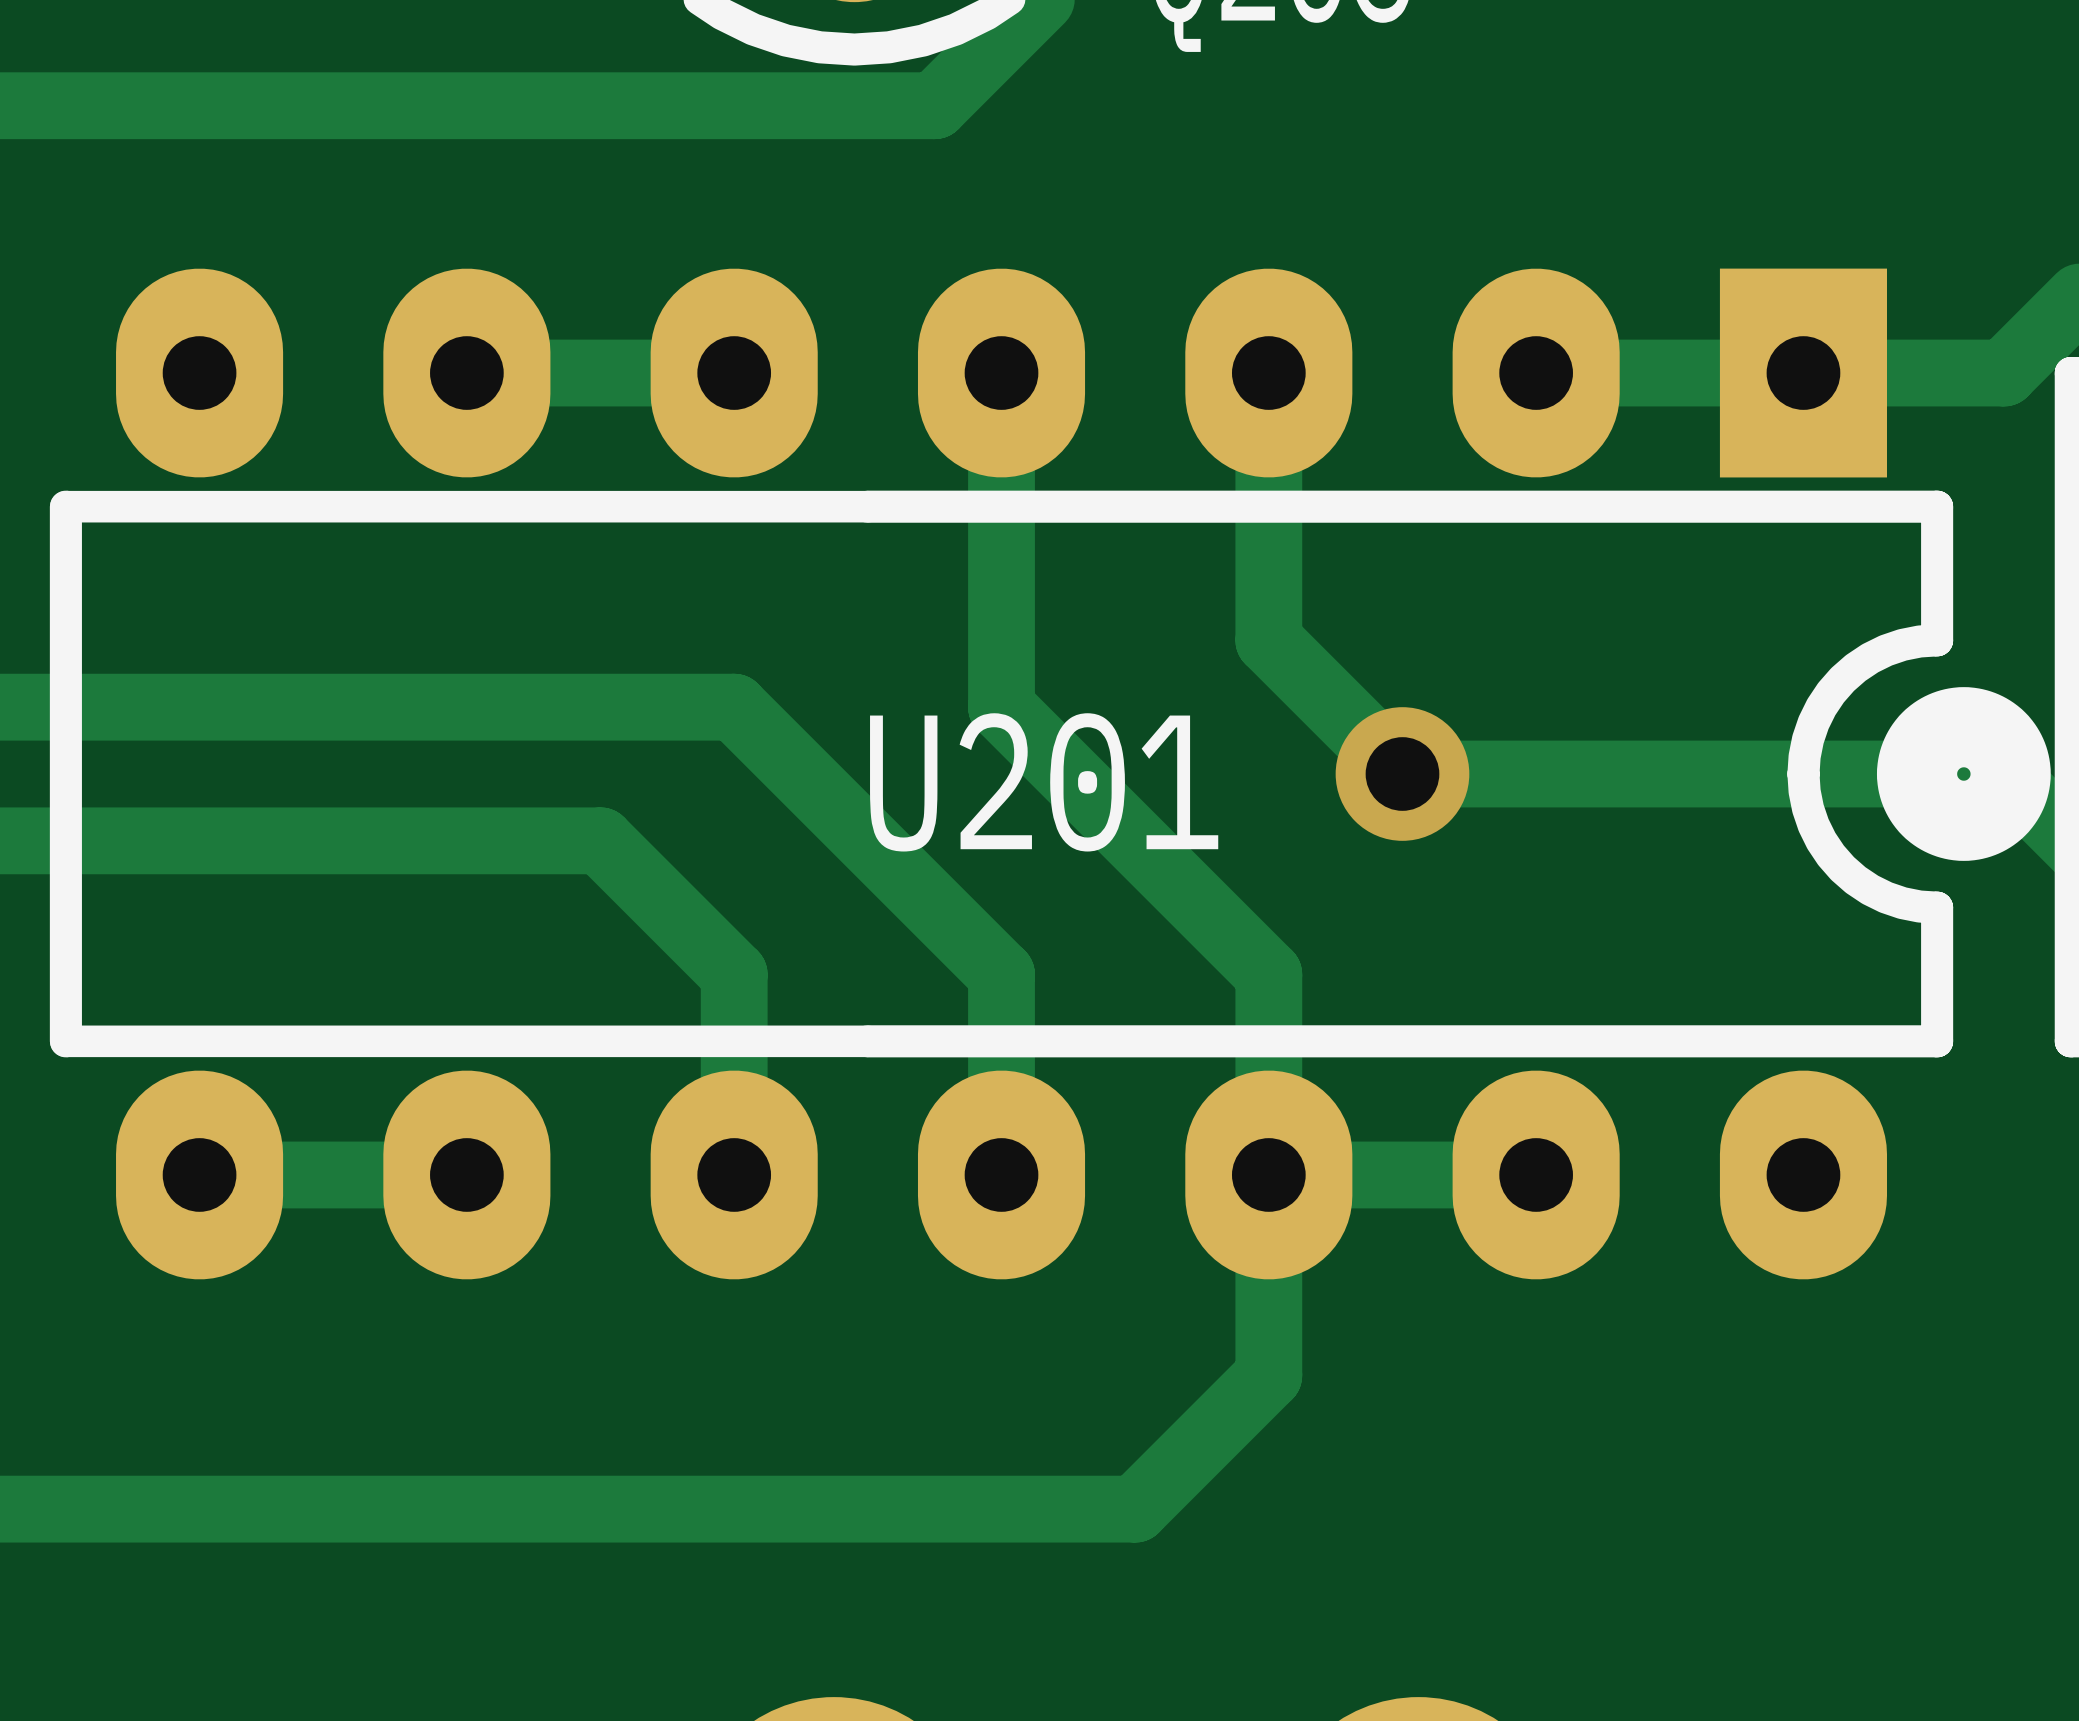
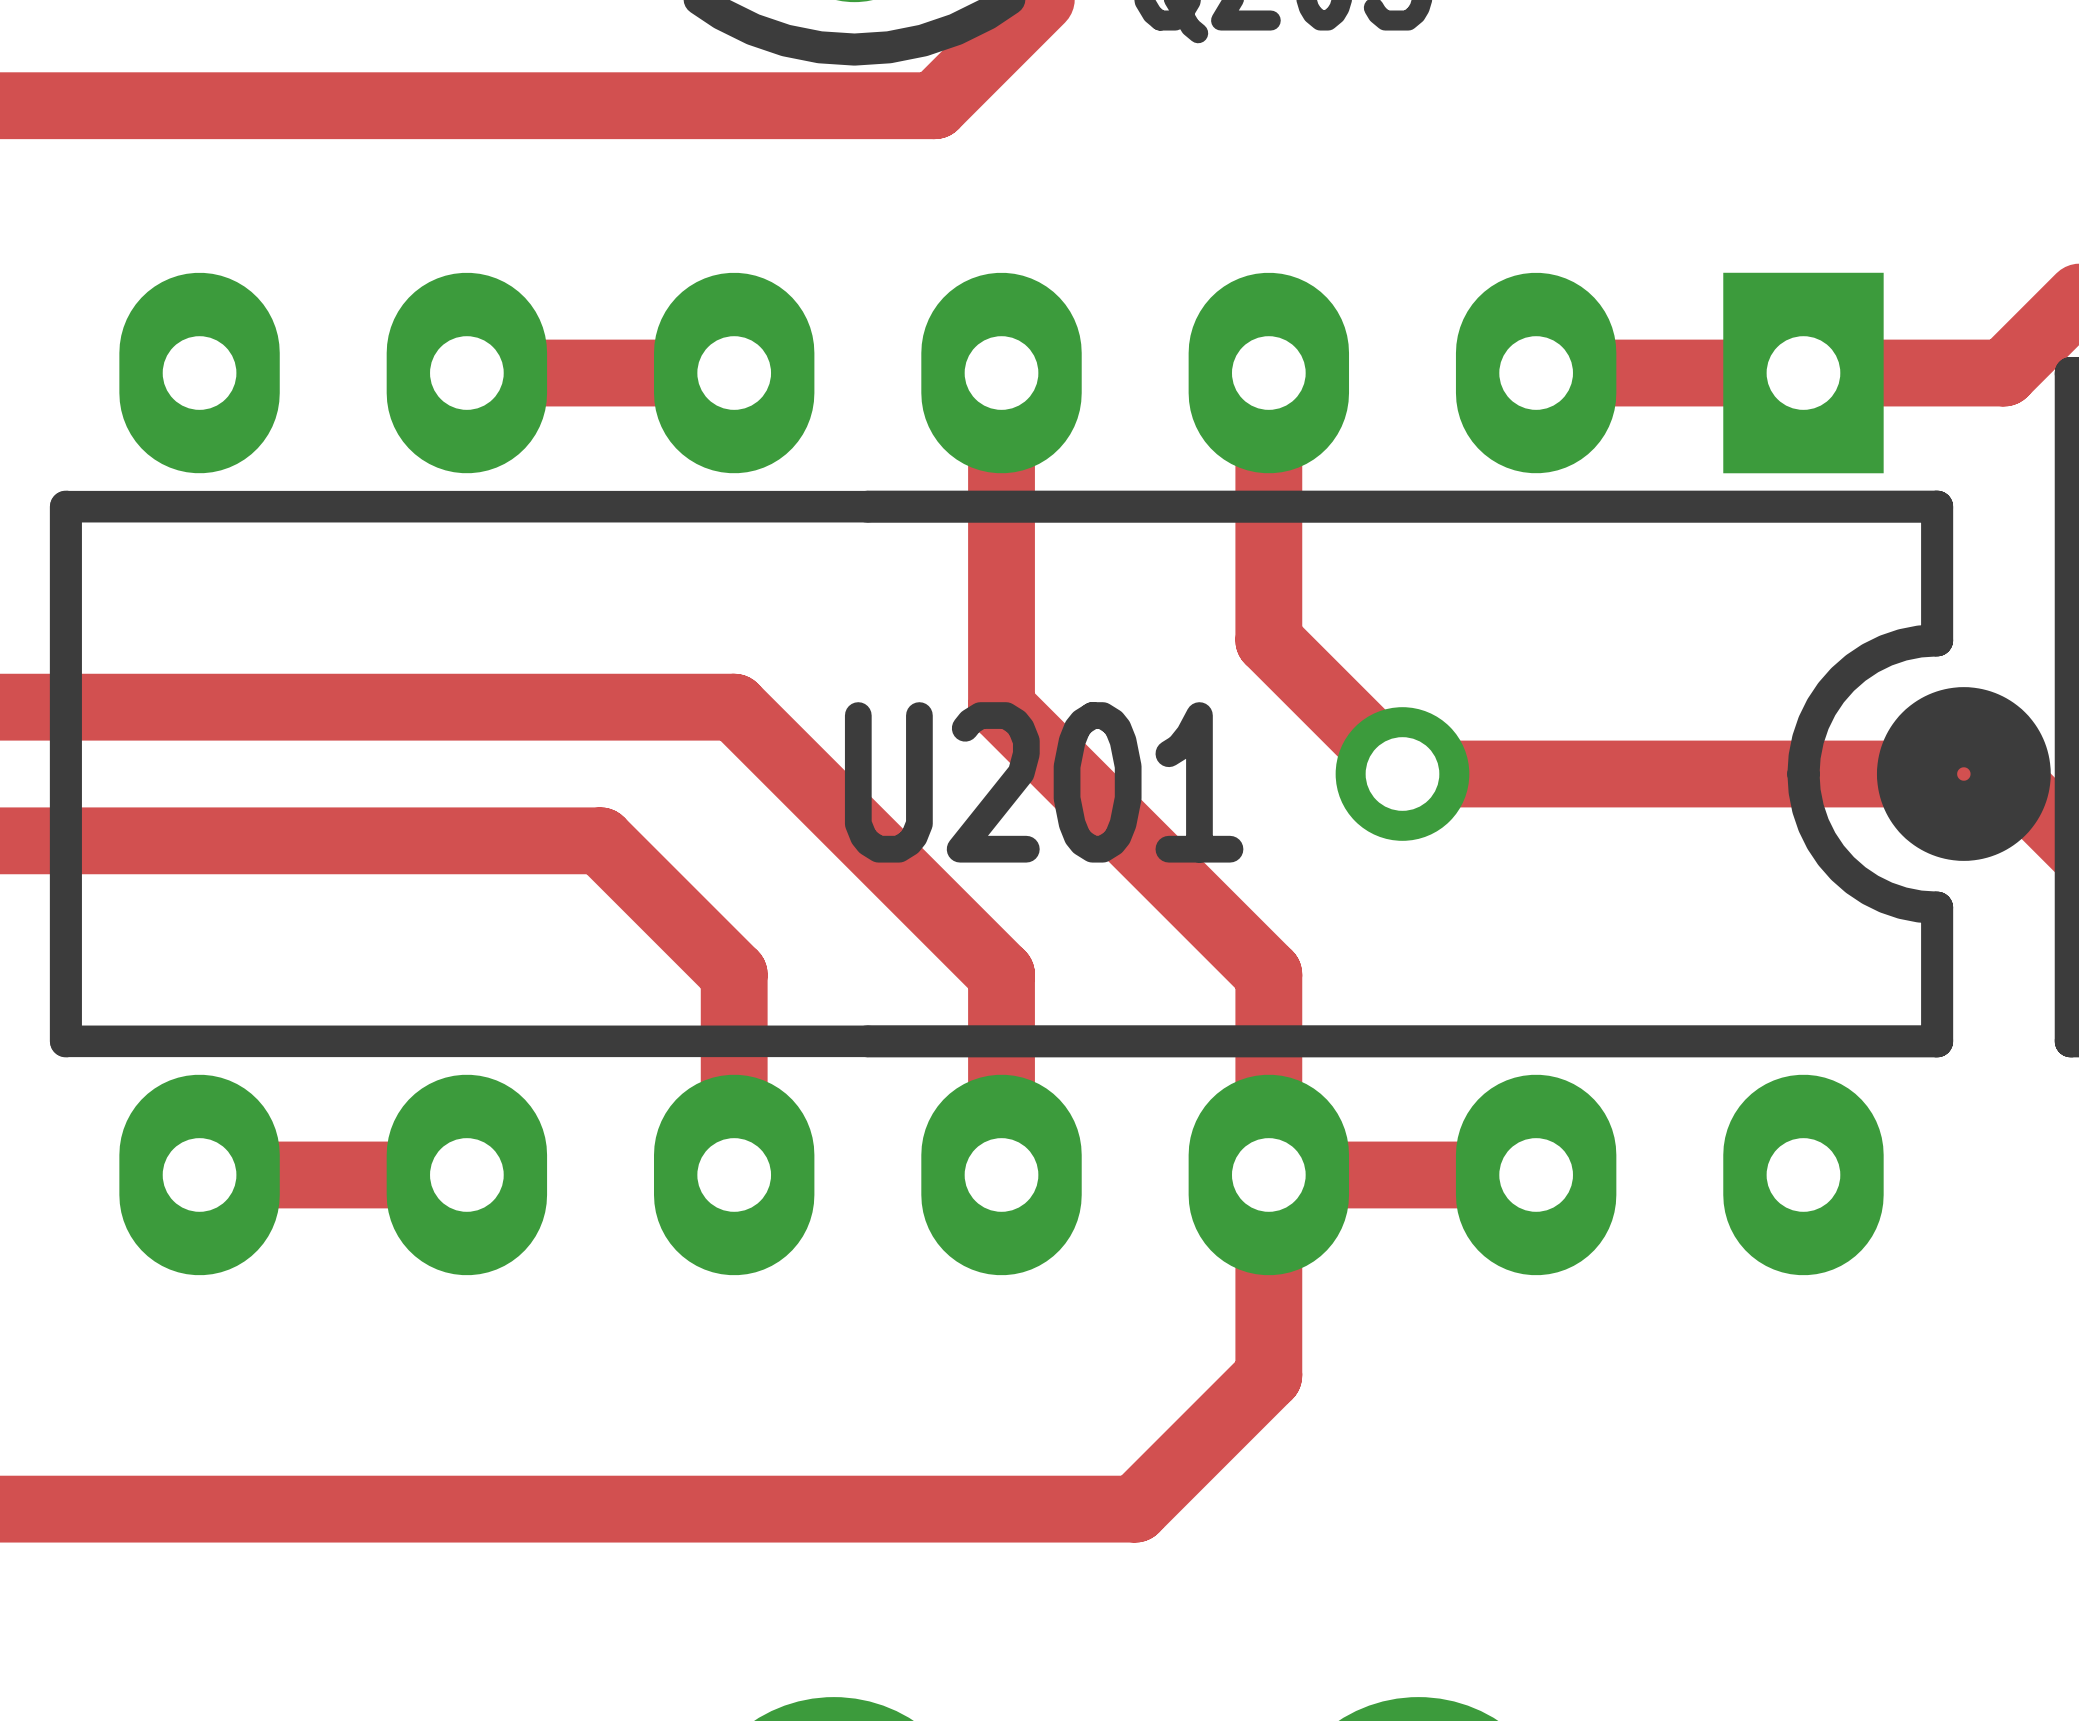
U201 footprint: [49, 268, 2051, 1280] -> [49, 272, 2051, 1276]

